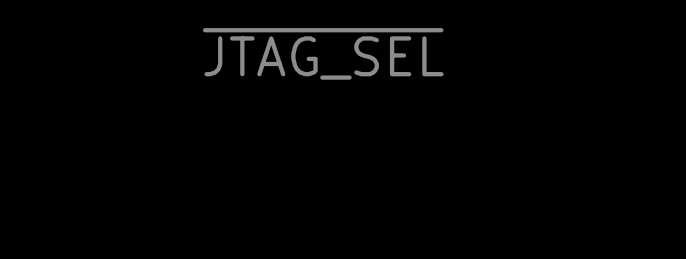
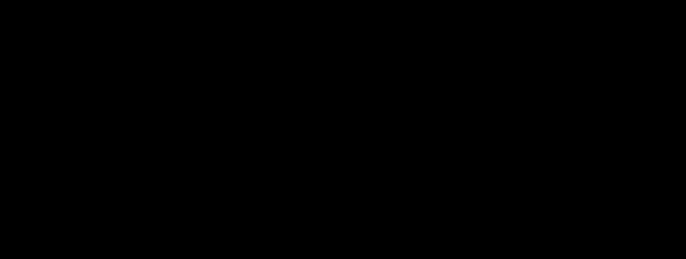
text: ~{JTAG_SEL} (323, 53) -> none

